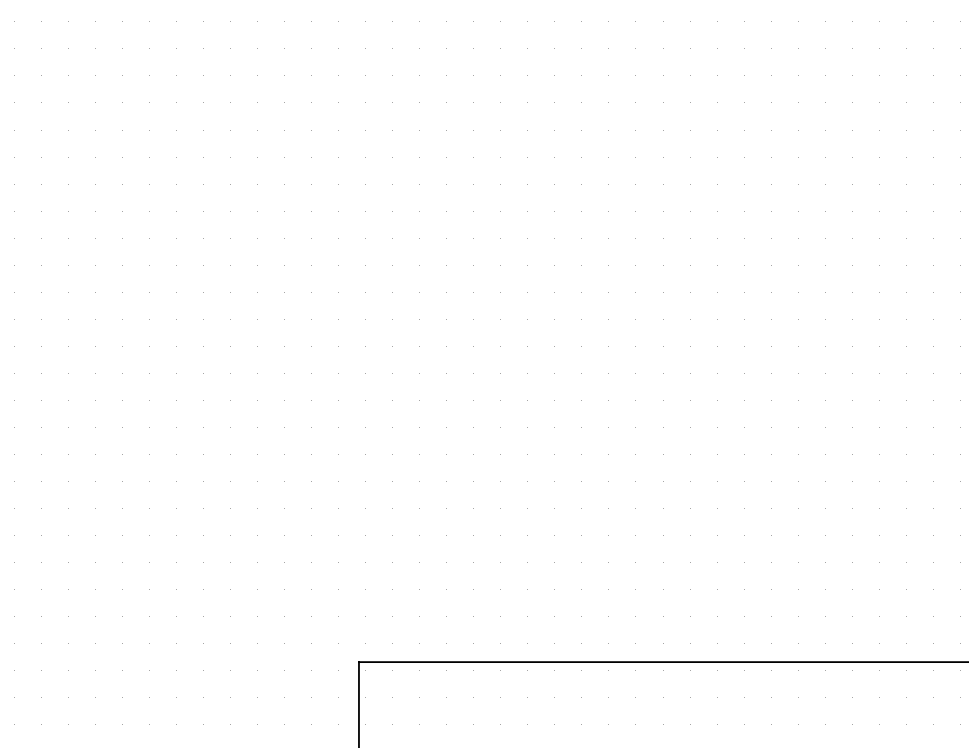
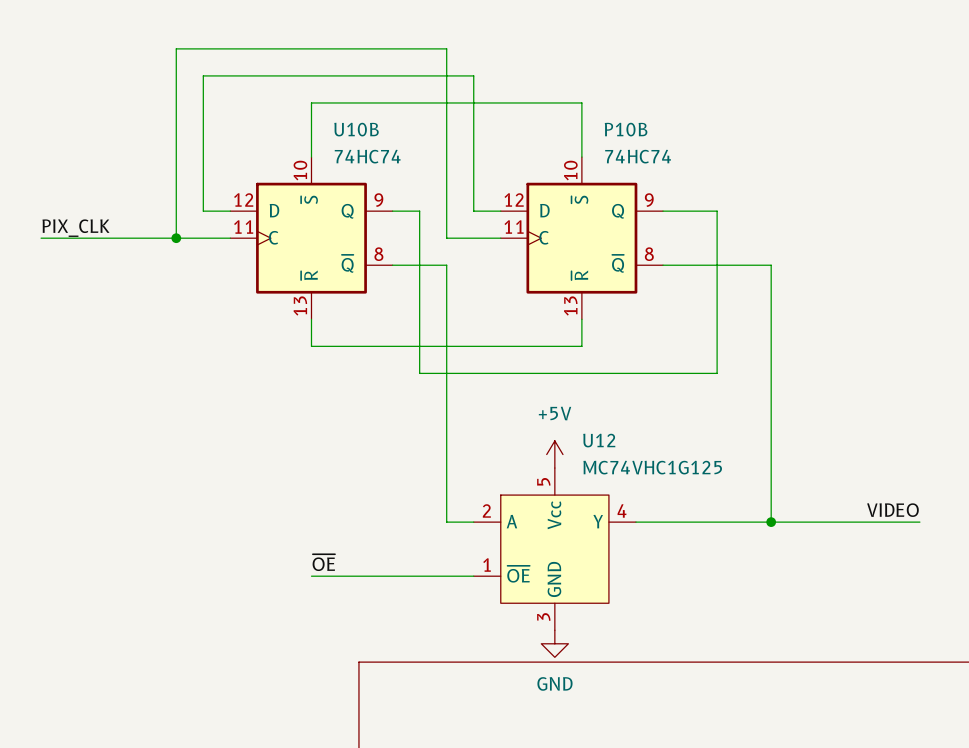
wire: none -> (311, 157) (311, 102) (581, 102) (581, 157)
wire: none -> (230, 211) (203, 211) (203, 75) (473, 75) (473, 211) (500, 211)
wire: none -> (392, 211) (419, 211) (419, 373) (717, 373) (717, 211) (663, 211)
label: none -> PIX_CLK (75, 228)
wire: none -> (41, 238) (230, 238)
wire: none -> (176, 238) (176, 48) (446, 48) (446, 238) (500, 238)
junction: none -> (176, 238)
U10B: none -> 74HC74 (311, 238)
P10B: none -> 74HC74 (581, 238)
wire: none -> (392, 265) (446, 265) (446, 522) (473, 522)
wire: none -> (663, 265) (771, 265) (771, 522)
wire: none -> (311, 319) (311, 346) (581, 346) (581, 319)
power symbol: none -> +5V (554, 454)
label: none -> VIDEO (892, 510)
wire: none -> (635, 522) (919, 522)
junction: none -> (771, 522)
U12: none -> MC74VHC1G125 (554, 549)
label: none -> ~{OE} (323, 562)
wire: none -> (311, 576) (473, 576)
power symbol: none -> GND (554, 643)

